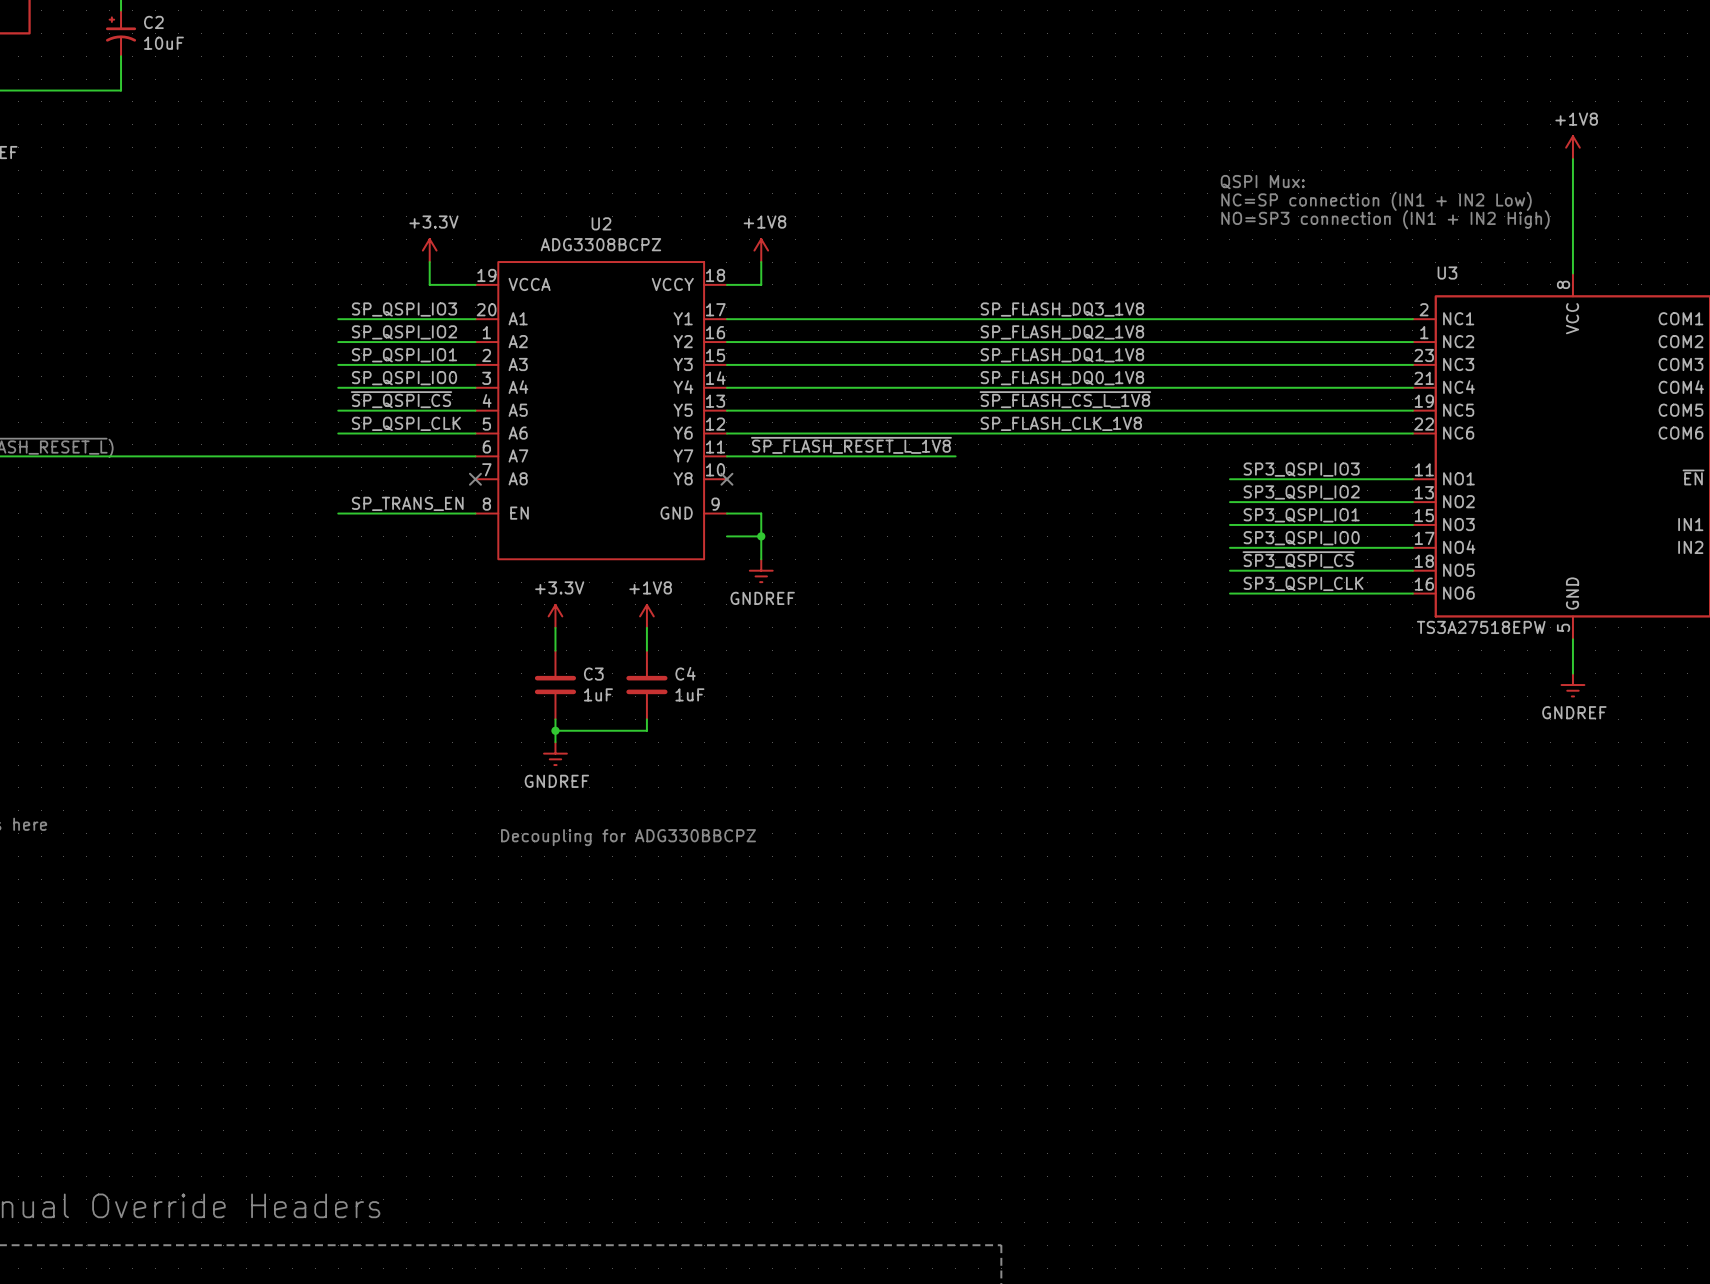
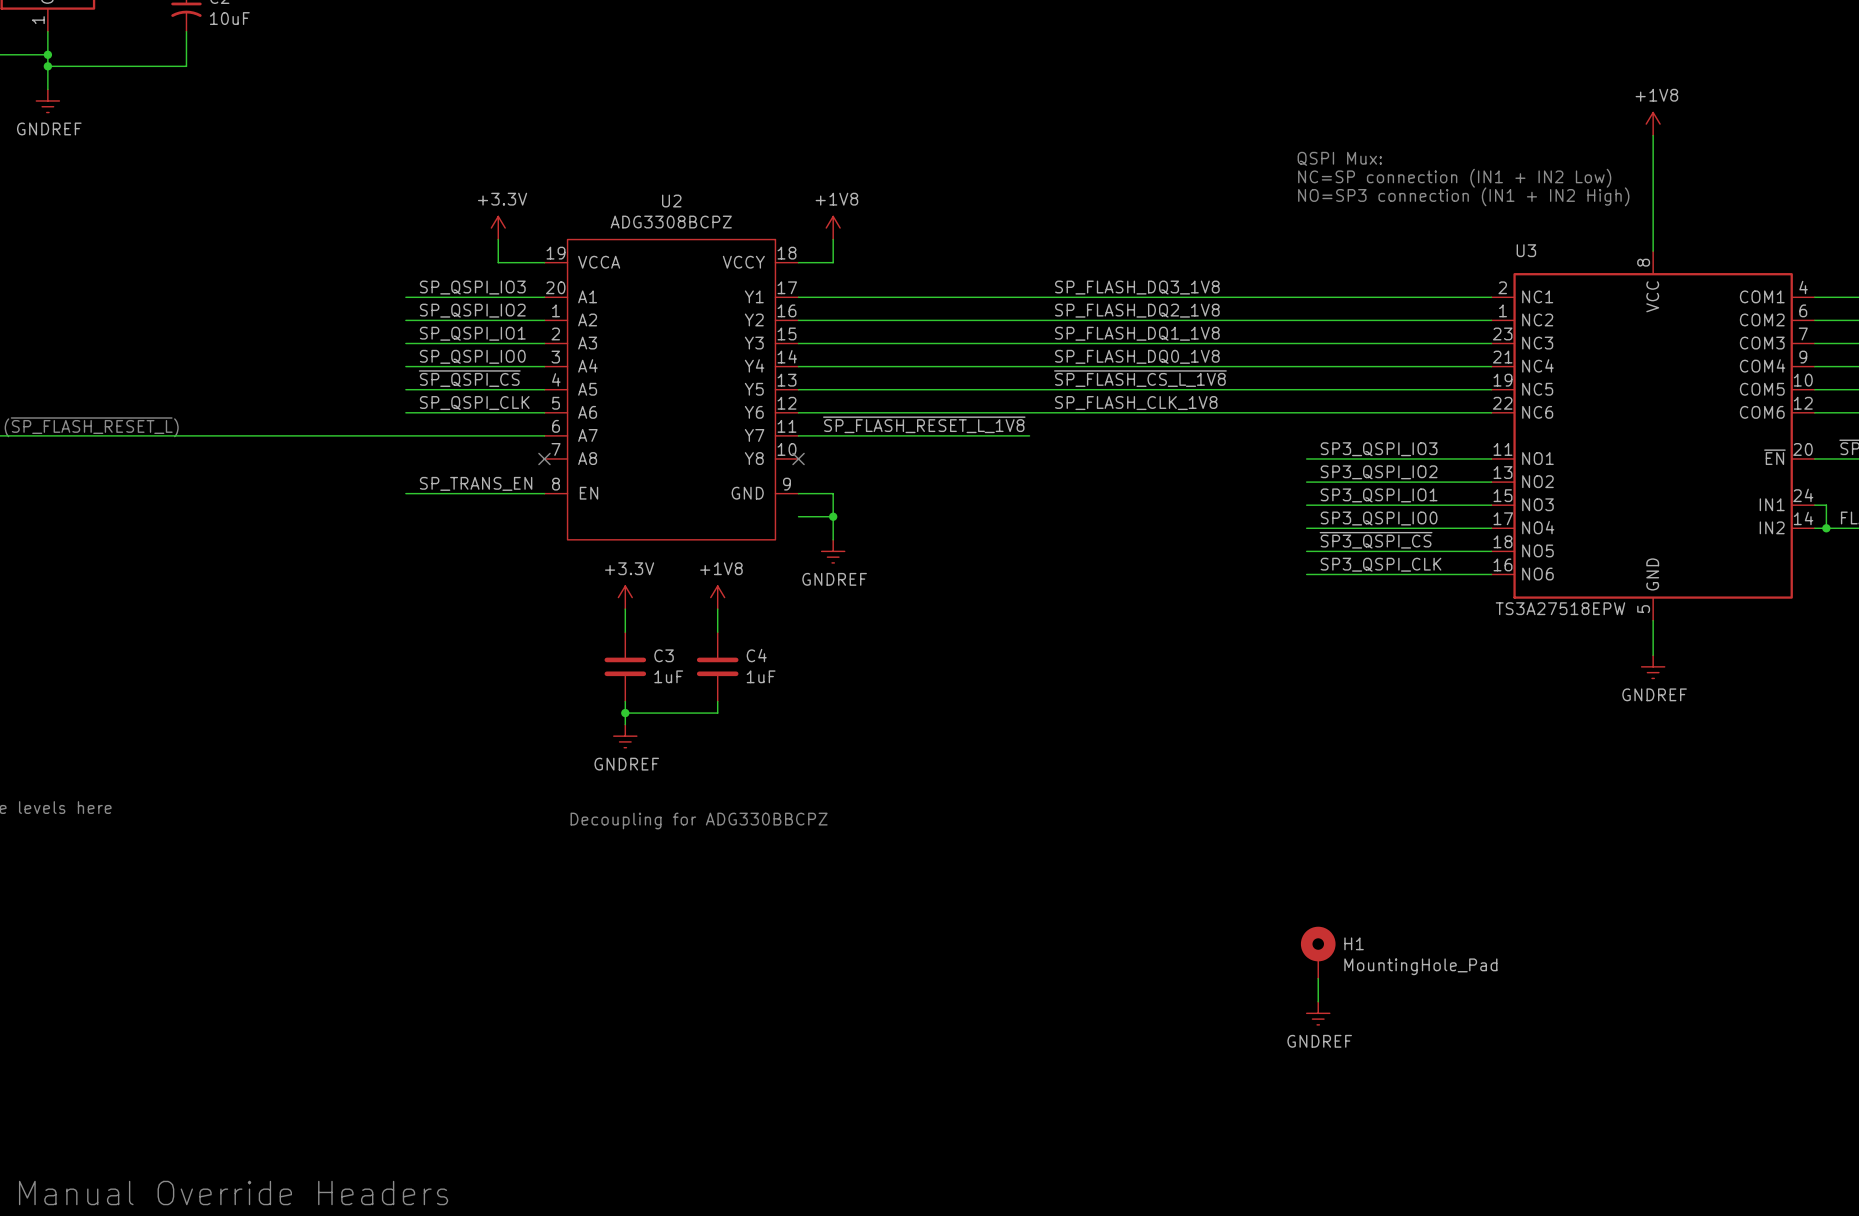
H1: none -> MountingHole_Pad (1318, 952)
wire: none -> (1318, 978) (1318, 1001)
power symbol: none -> GNDREF (1318, 1013)

